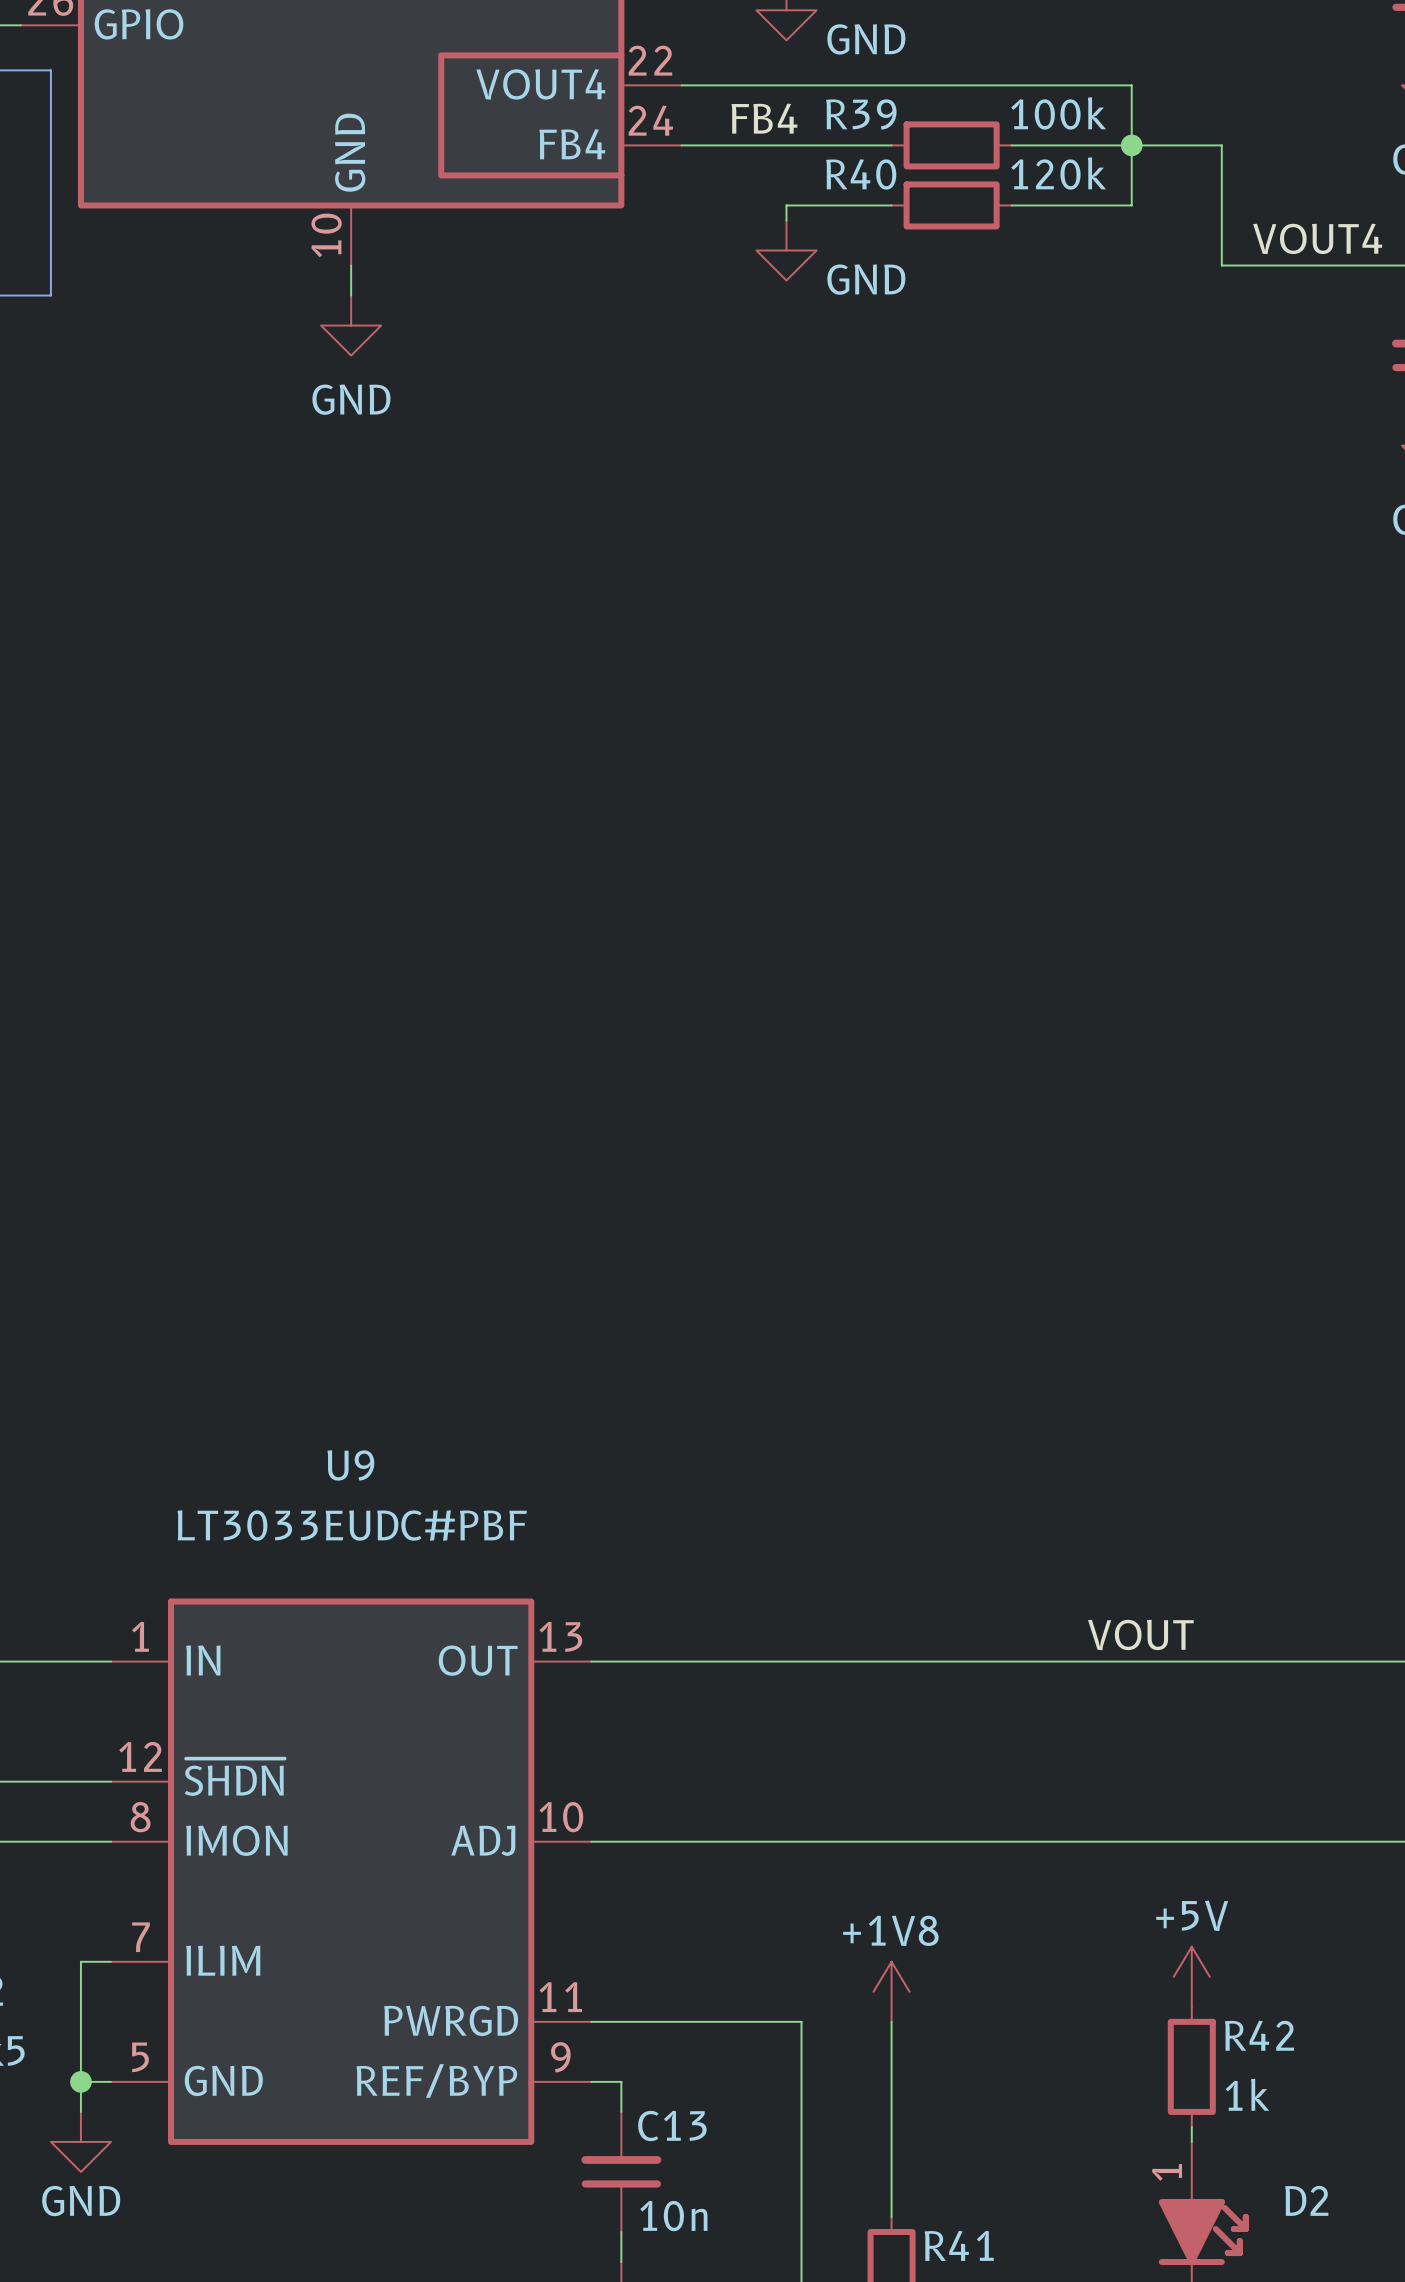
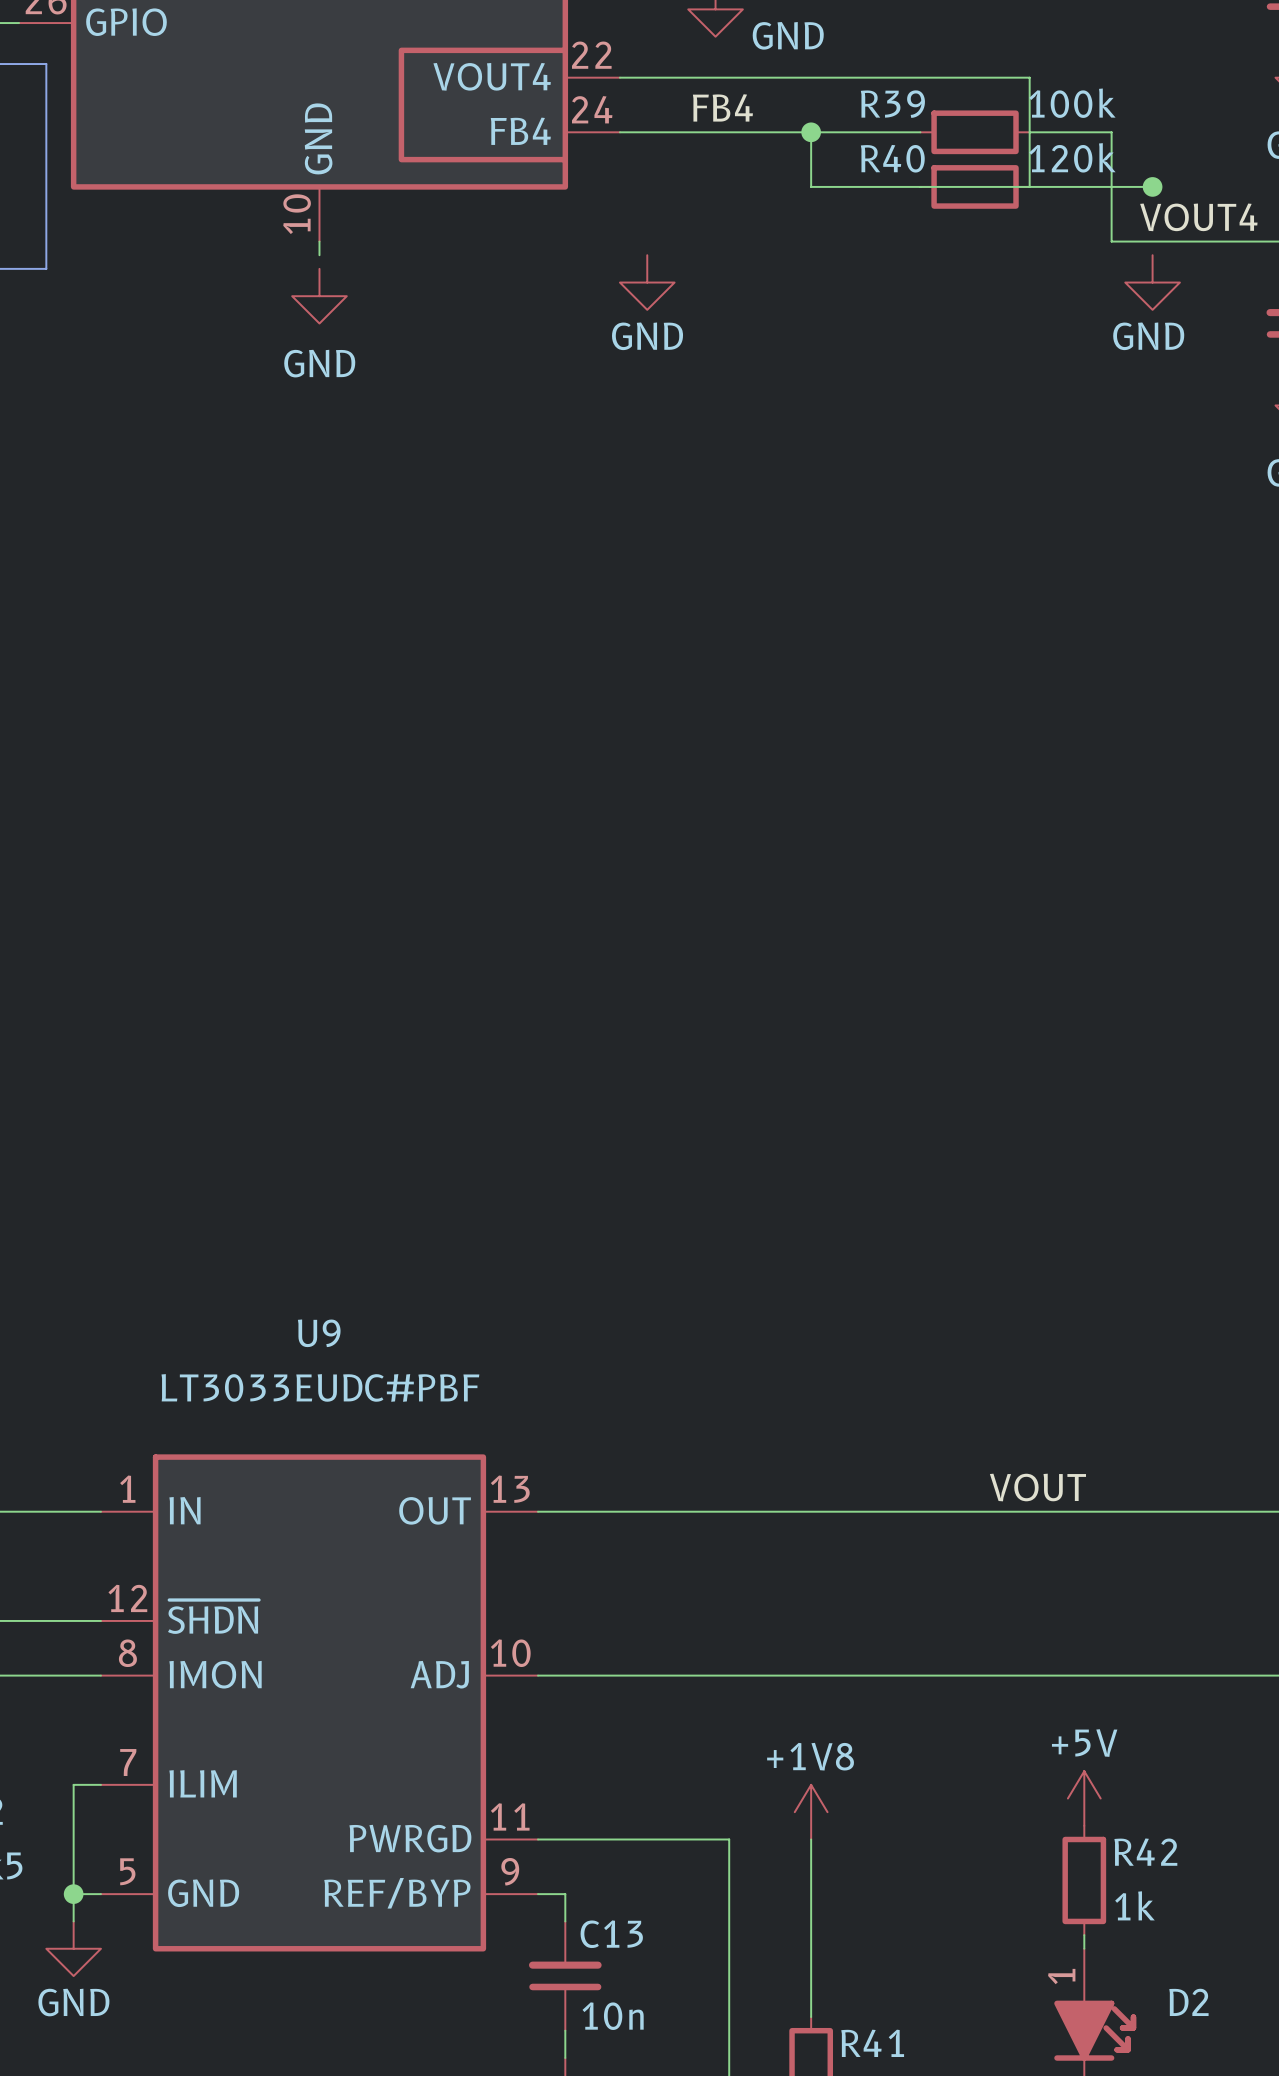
label position: FB4 (764, 118) -> FB4 (722, 107)
junction: none -> (811, 132)
R39 position: (951, 145) -> (975, 132)
wire: (1011, 145) (1131, 145) -> (920, 132) (811, 132) (811, 186) (920, 186)
junction: (1131, 145) -> none
wire: (891, 205) (786, 205) (786, 220) -> none
R40 position: (951, 205) -> (975, 186)
wire: none -> (1029, 186) (1152, 186)
junction: none -> (1152, 186)
power symbol position: GND (786, 250) -> GND (647, 282)
power symbol text position: GND (866, 279) -> GND (647, 336)
wire: (351, 280) (351, 295) -> none
power symbol: none -> GND (1152, 282)

